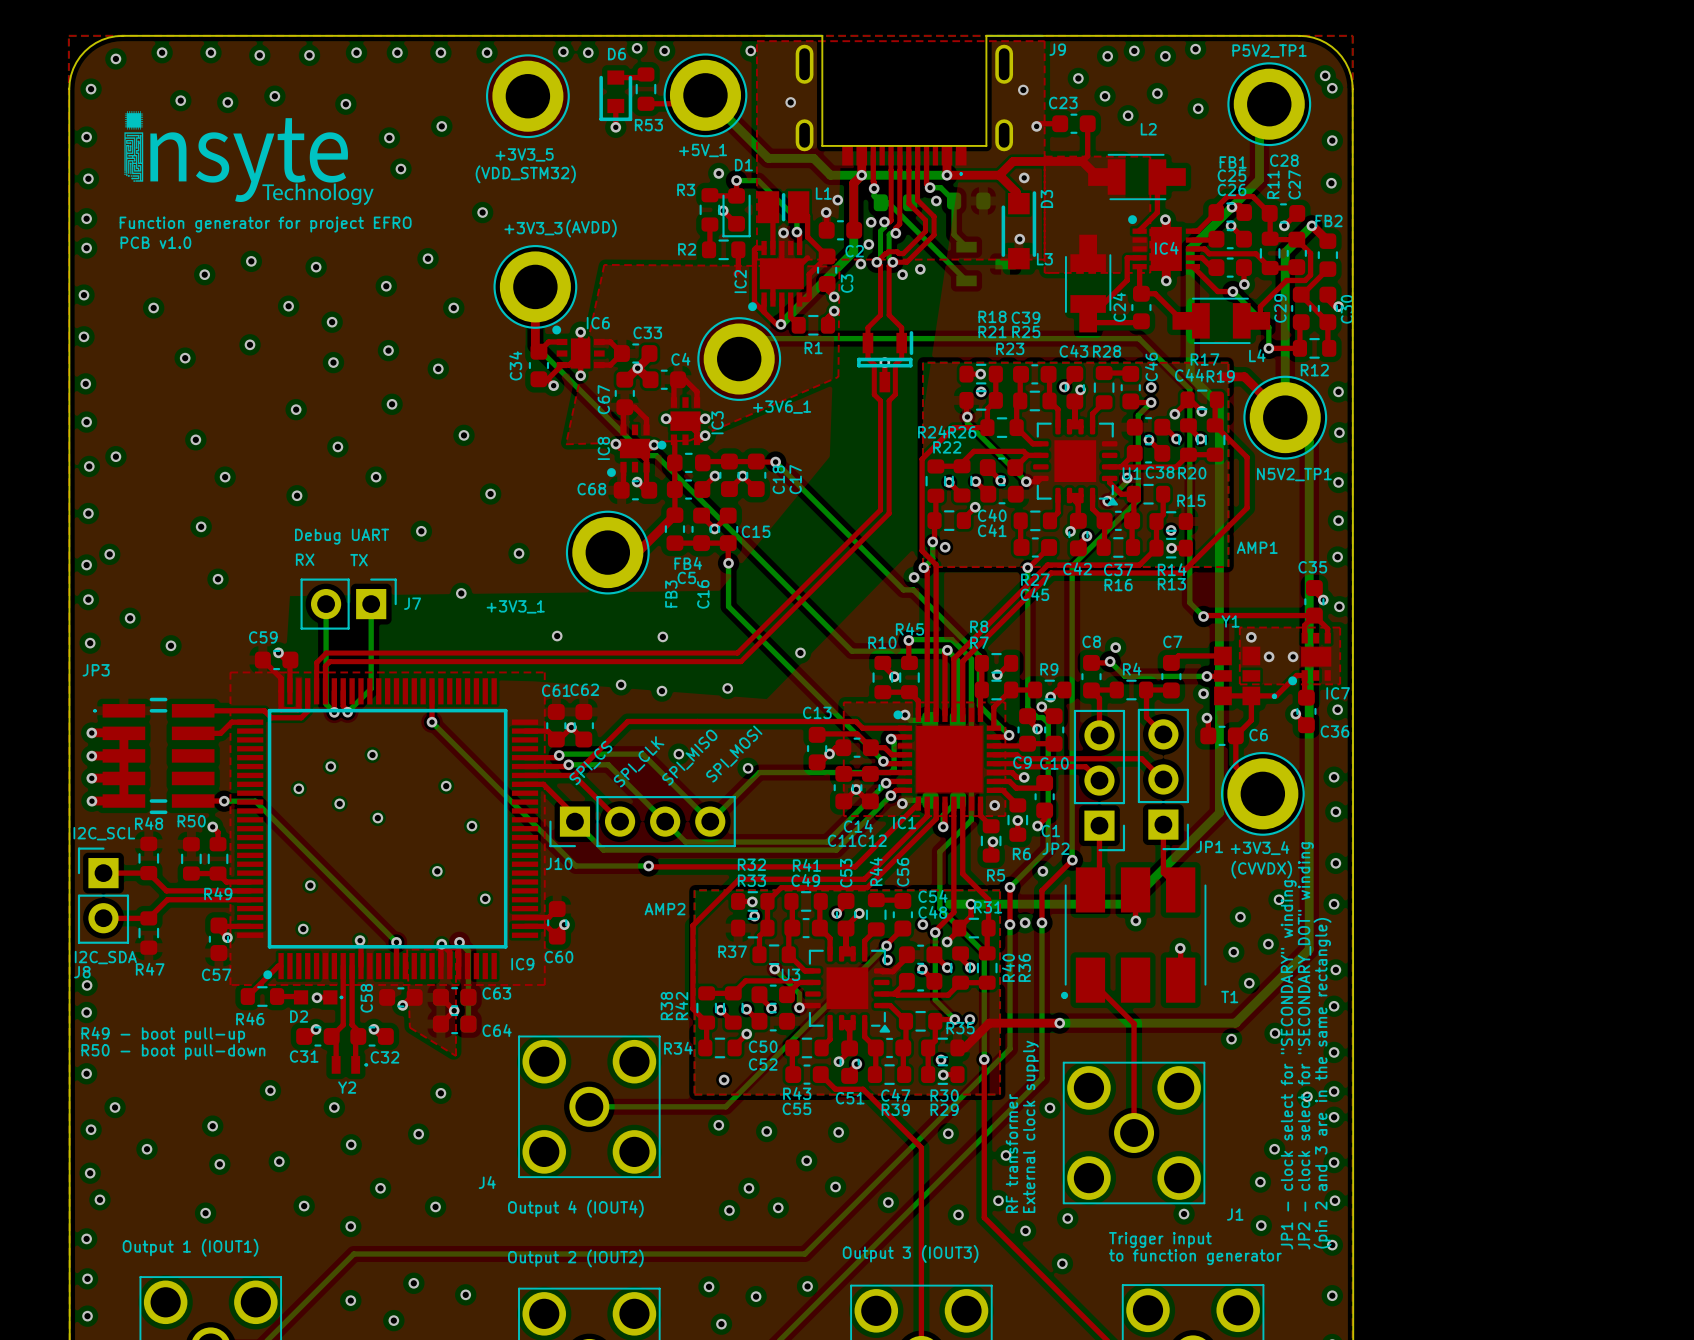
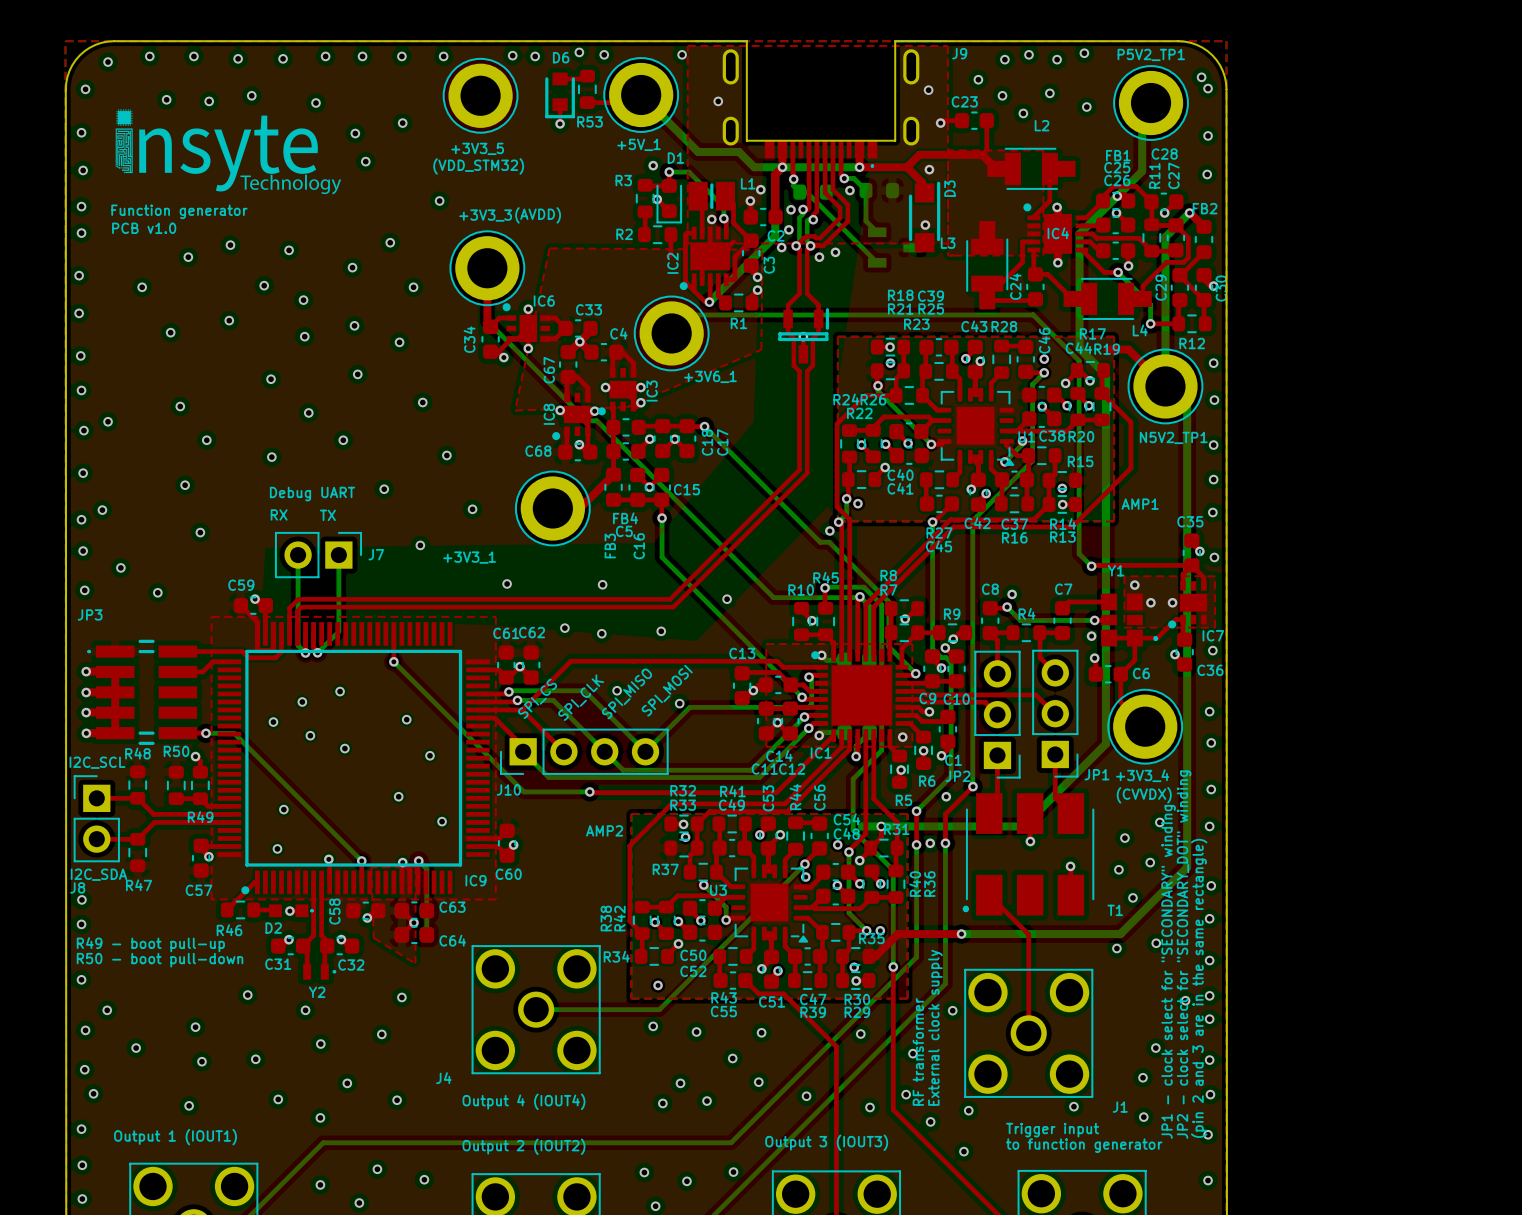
text: Function generator for project EFRO (265, 224) -> Function generator (179, 211)

